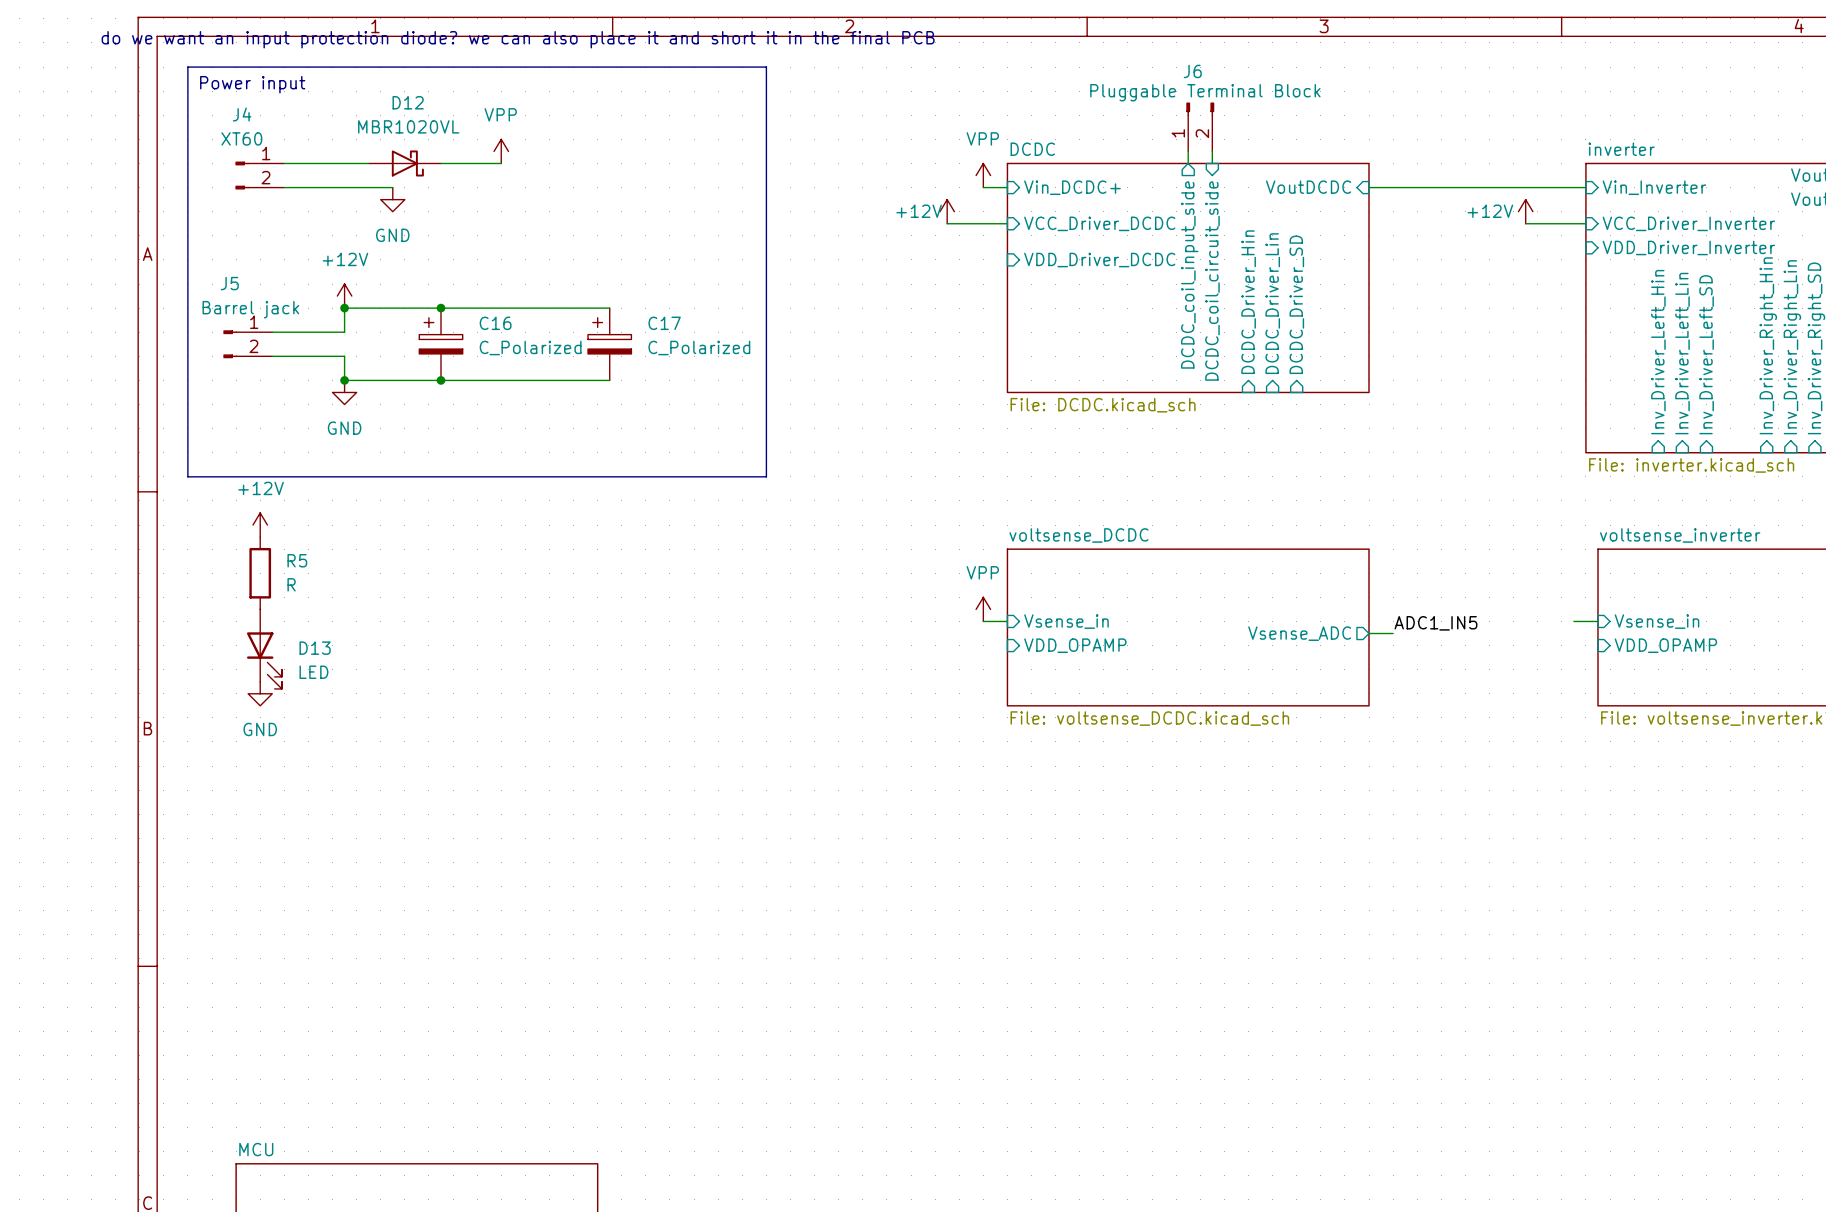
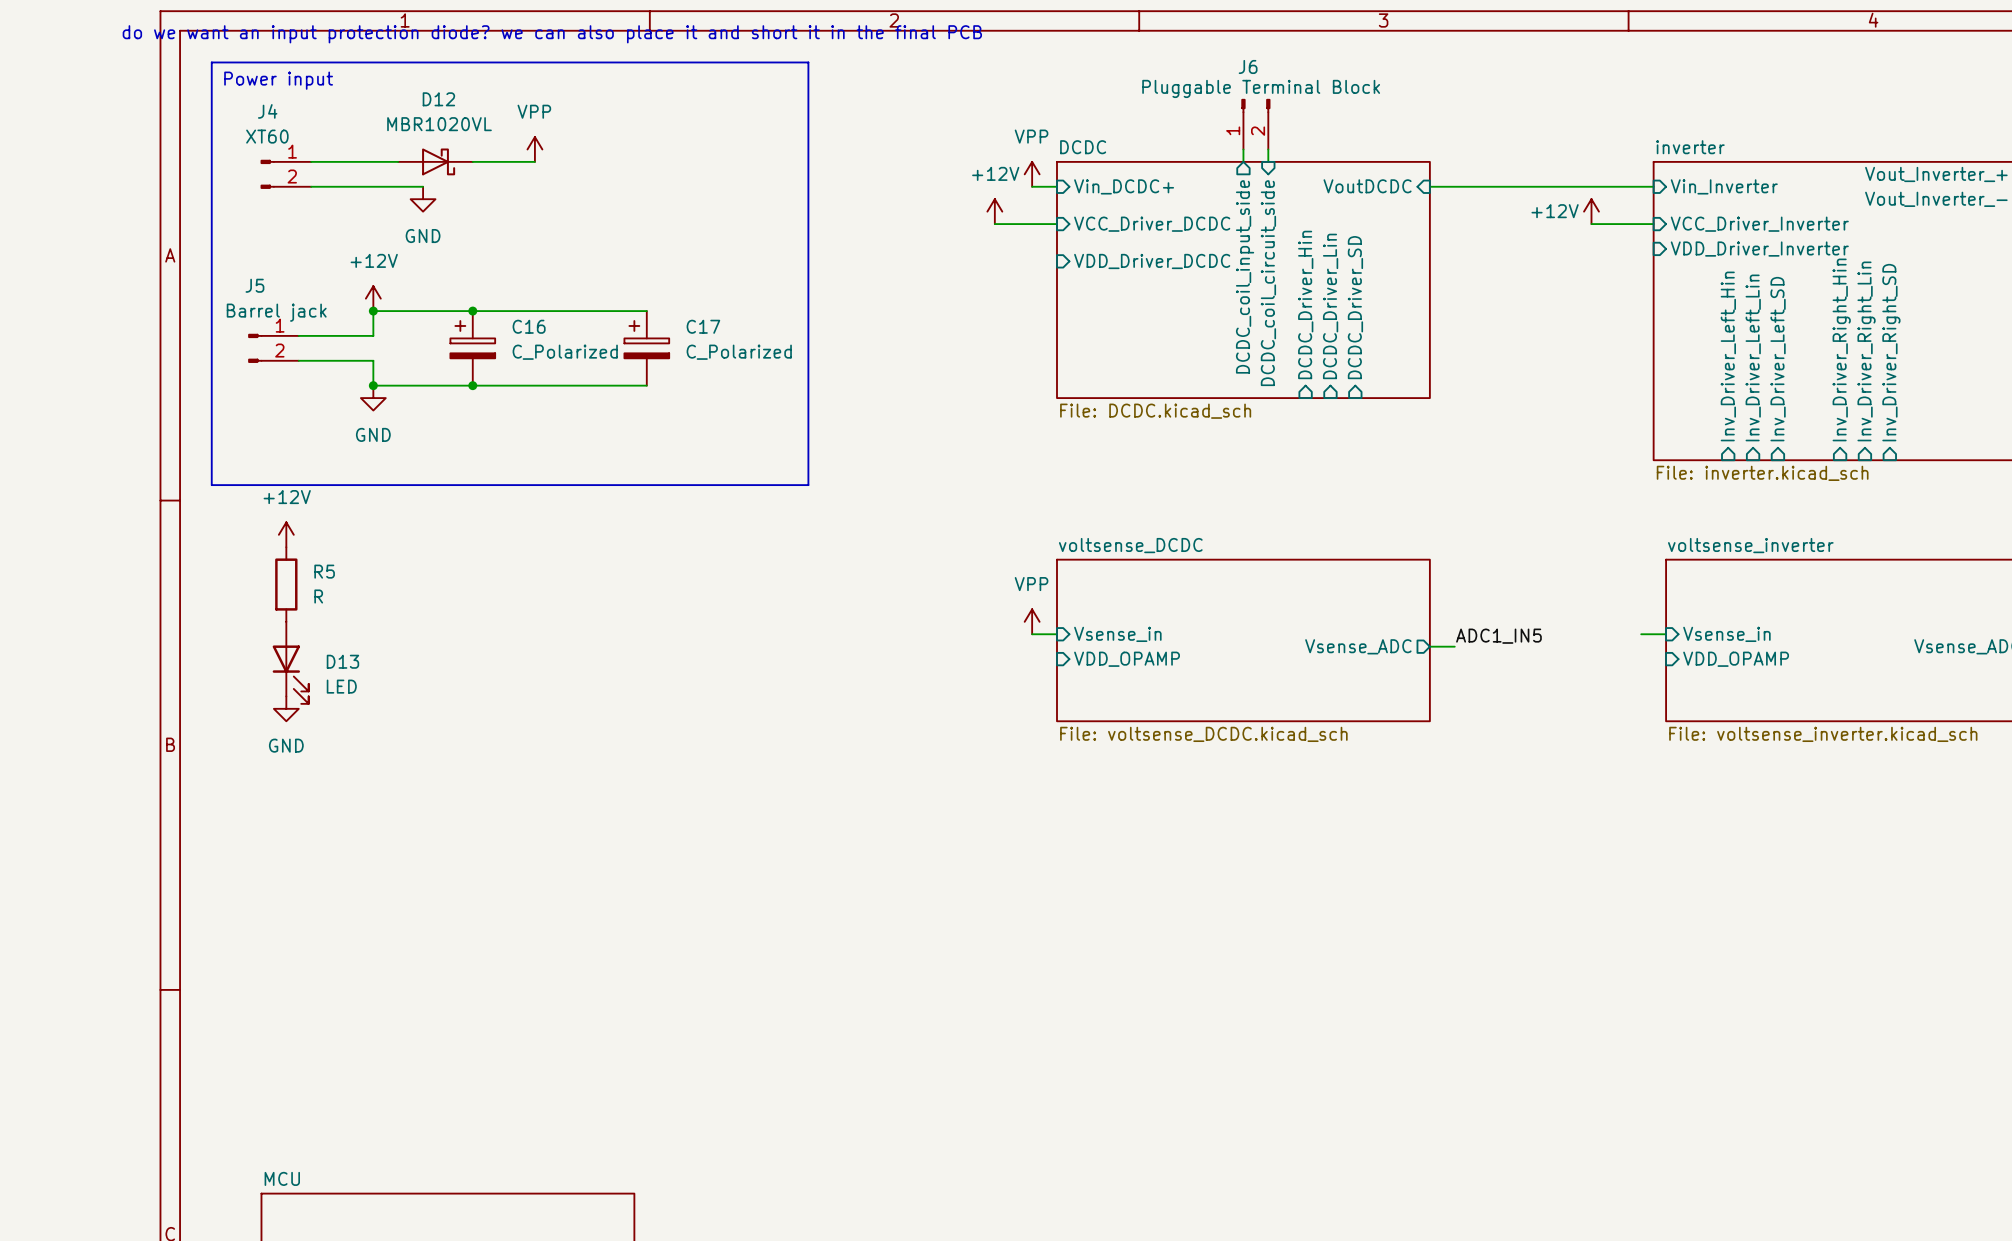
power symbol text position: +12V (919, 211) -> +12V (995, 173)

